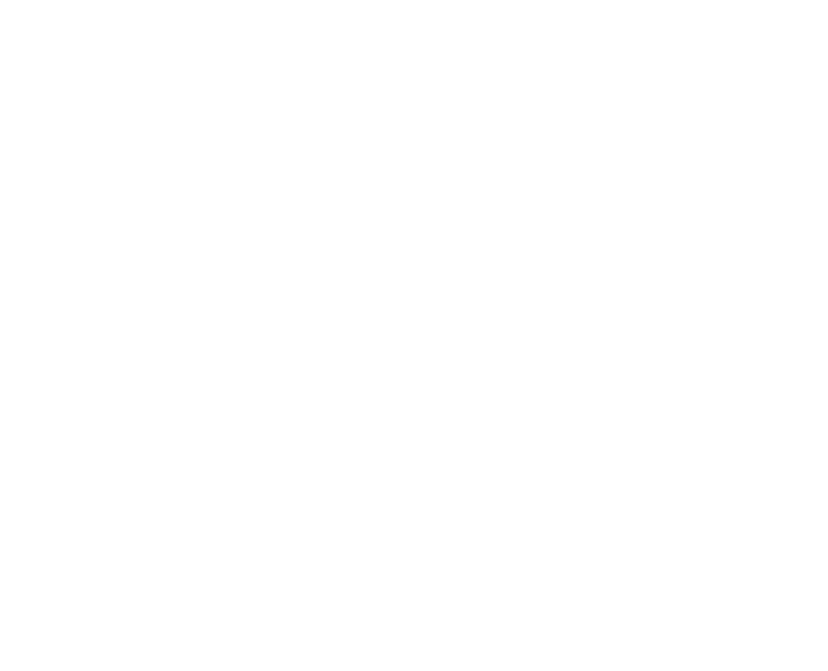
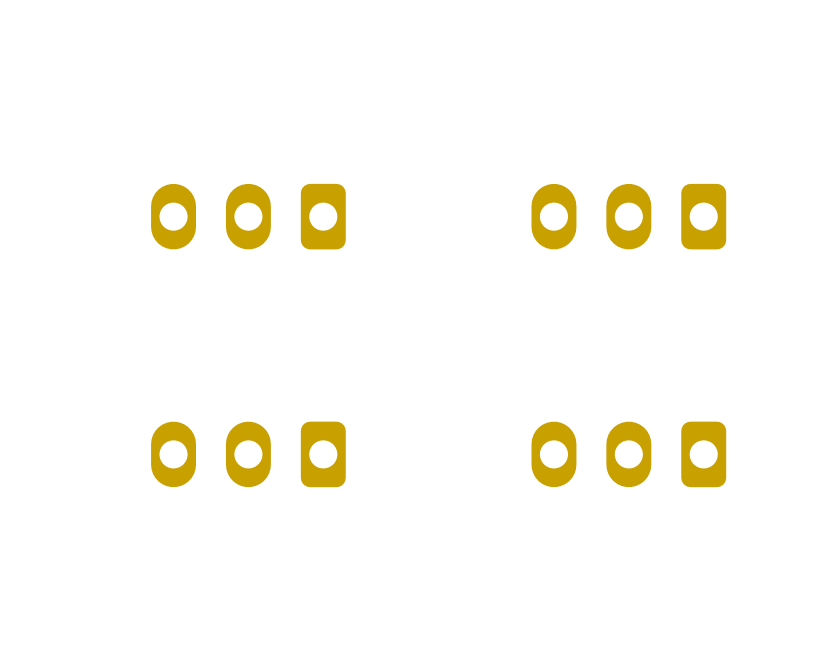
part: none -> (248, 216)
part: none -> (628, 216)
part: none -> (248, 454)
part: none -> (628, 454)

